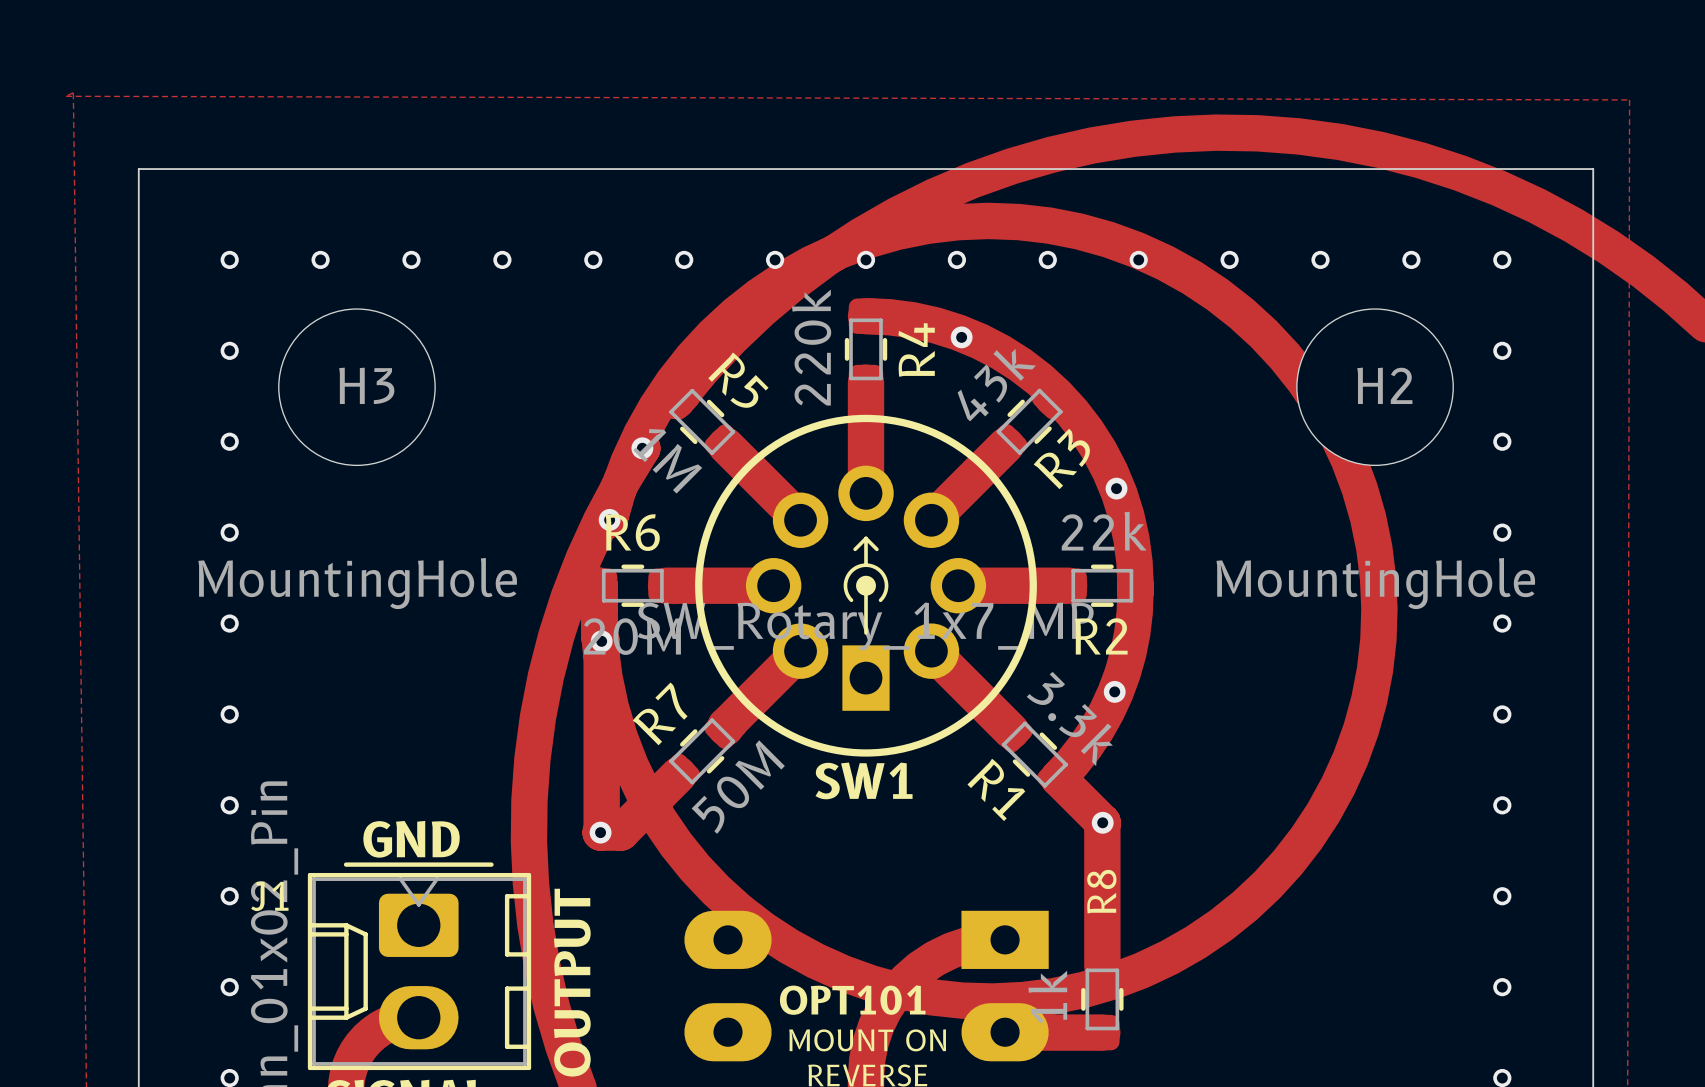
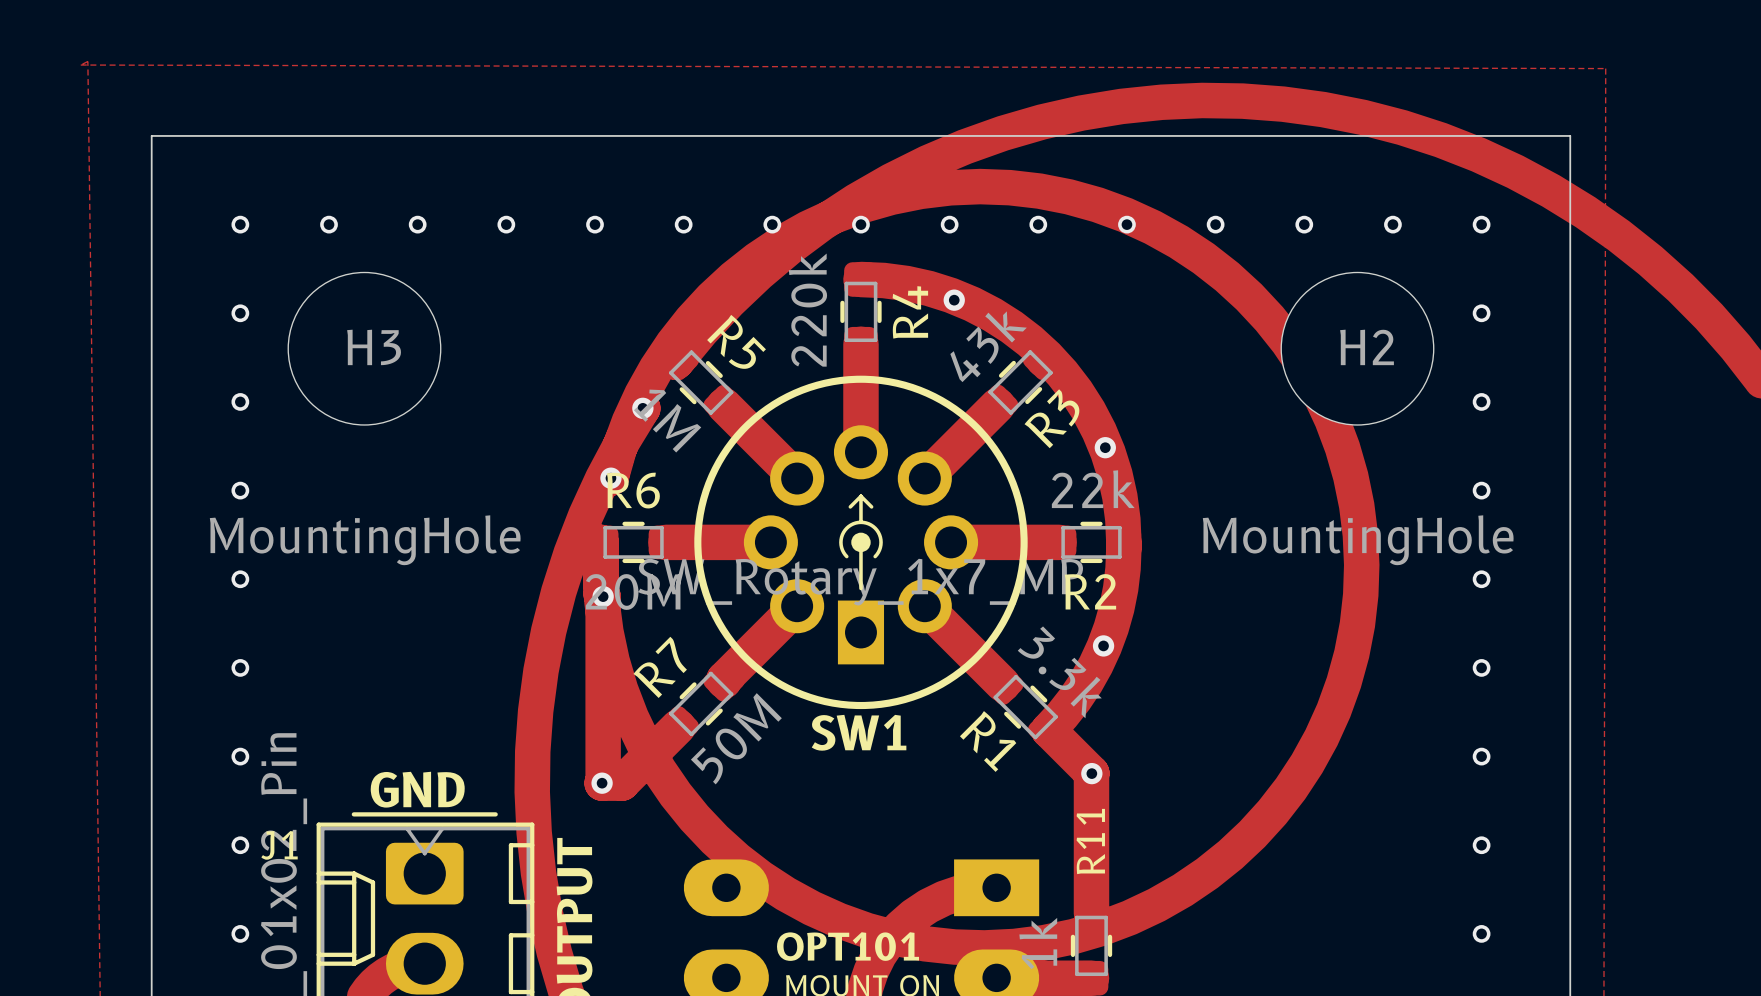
R8 name: R8 (1101, 891) -> R11 (1090, 841)

